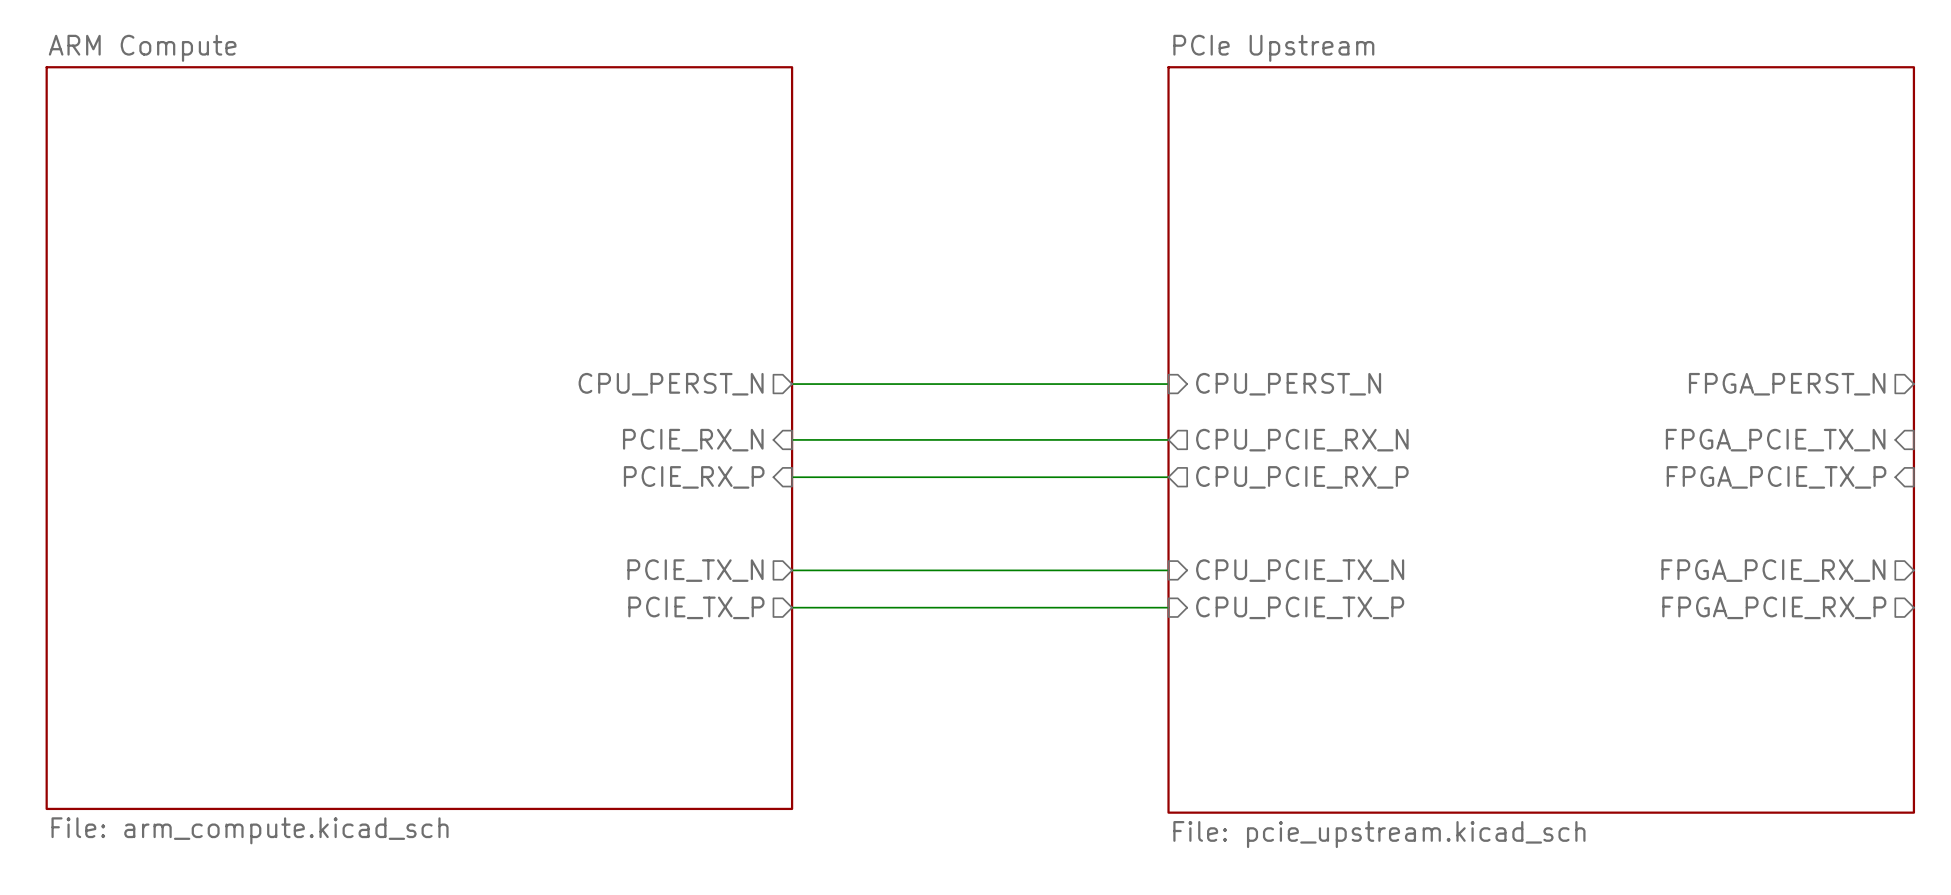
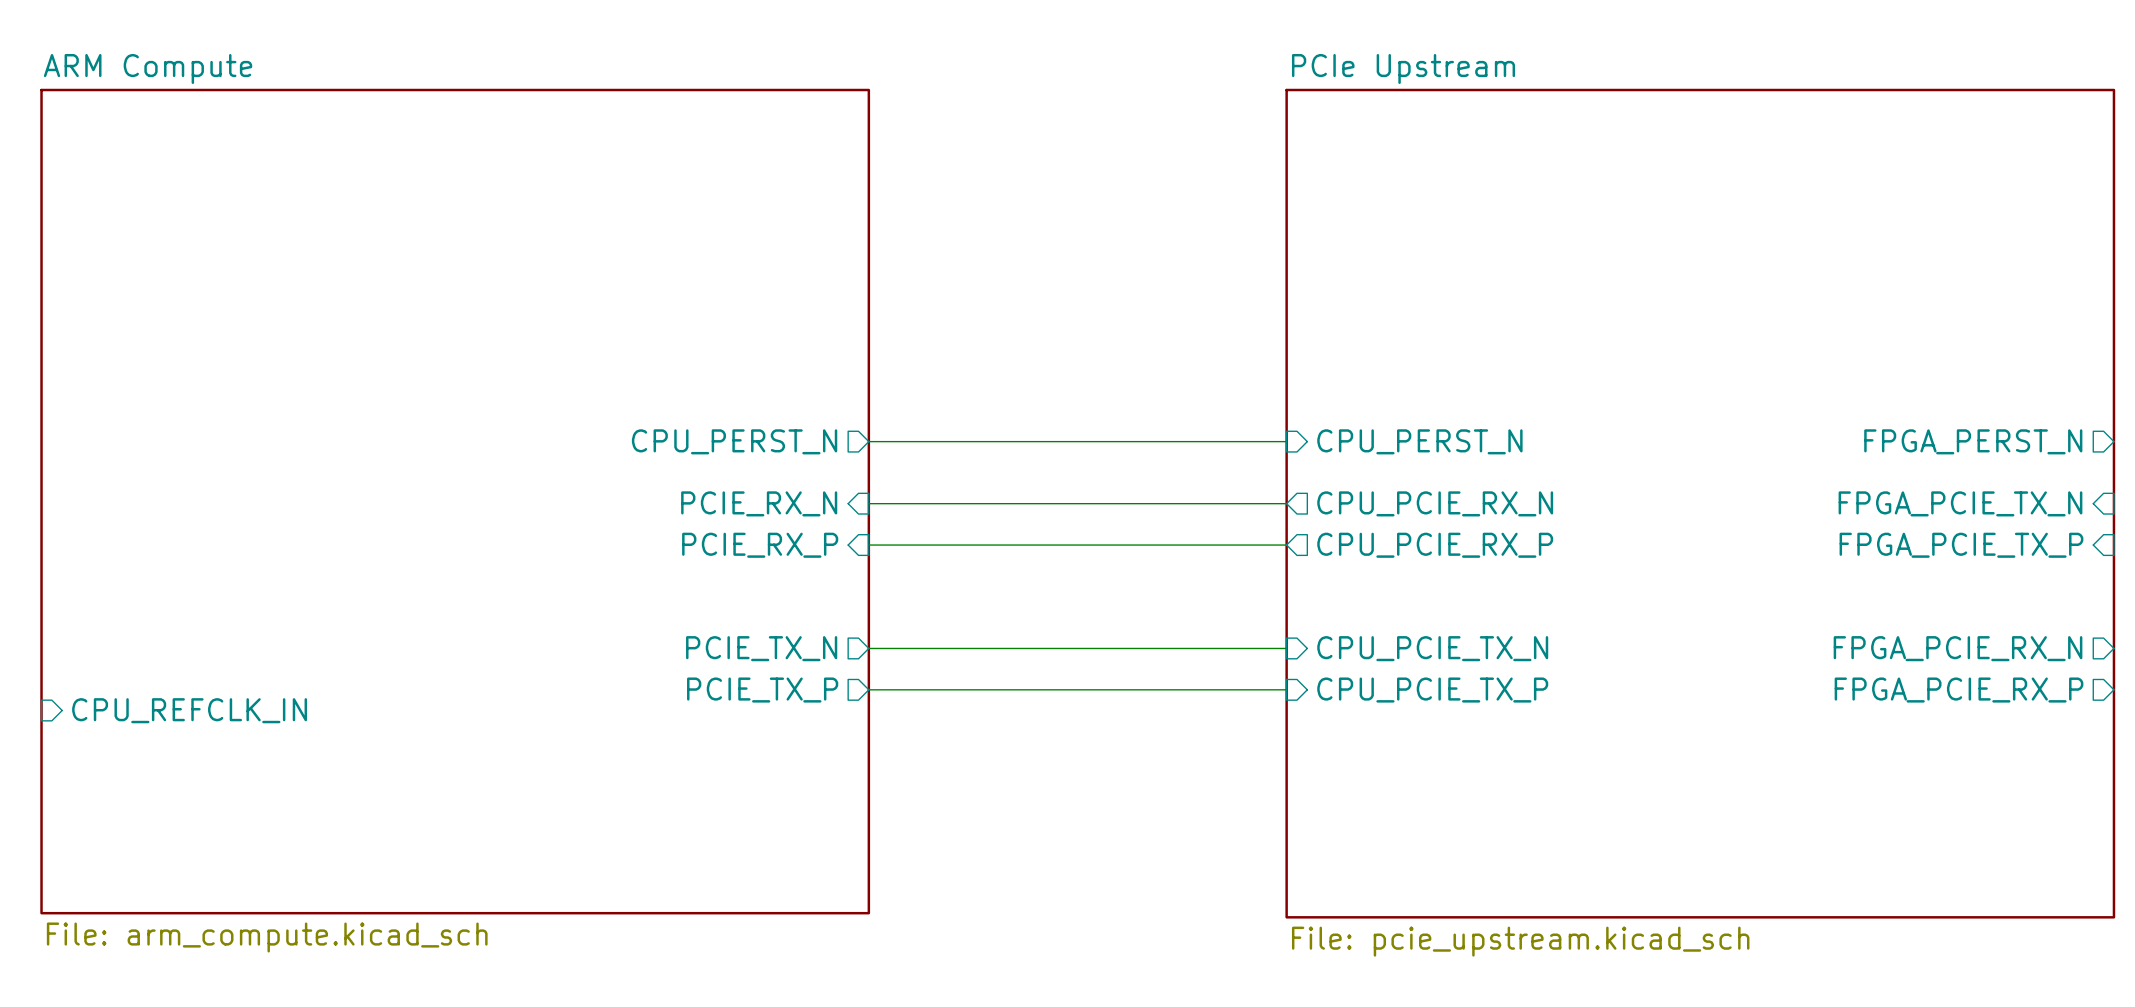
sheet pin: none -> CPU_REFCLK_IN (189, 710)

